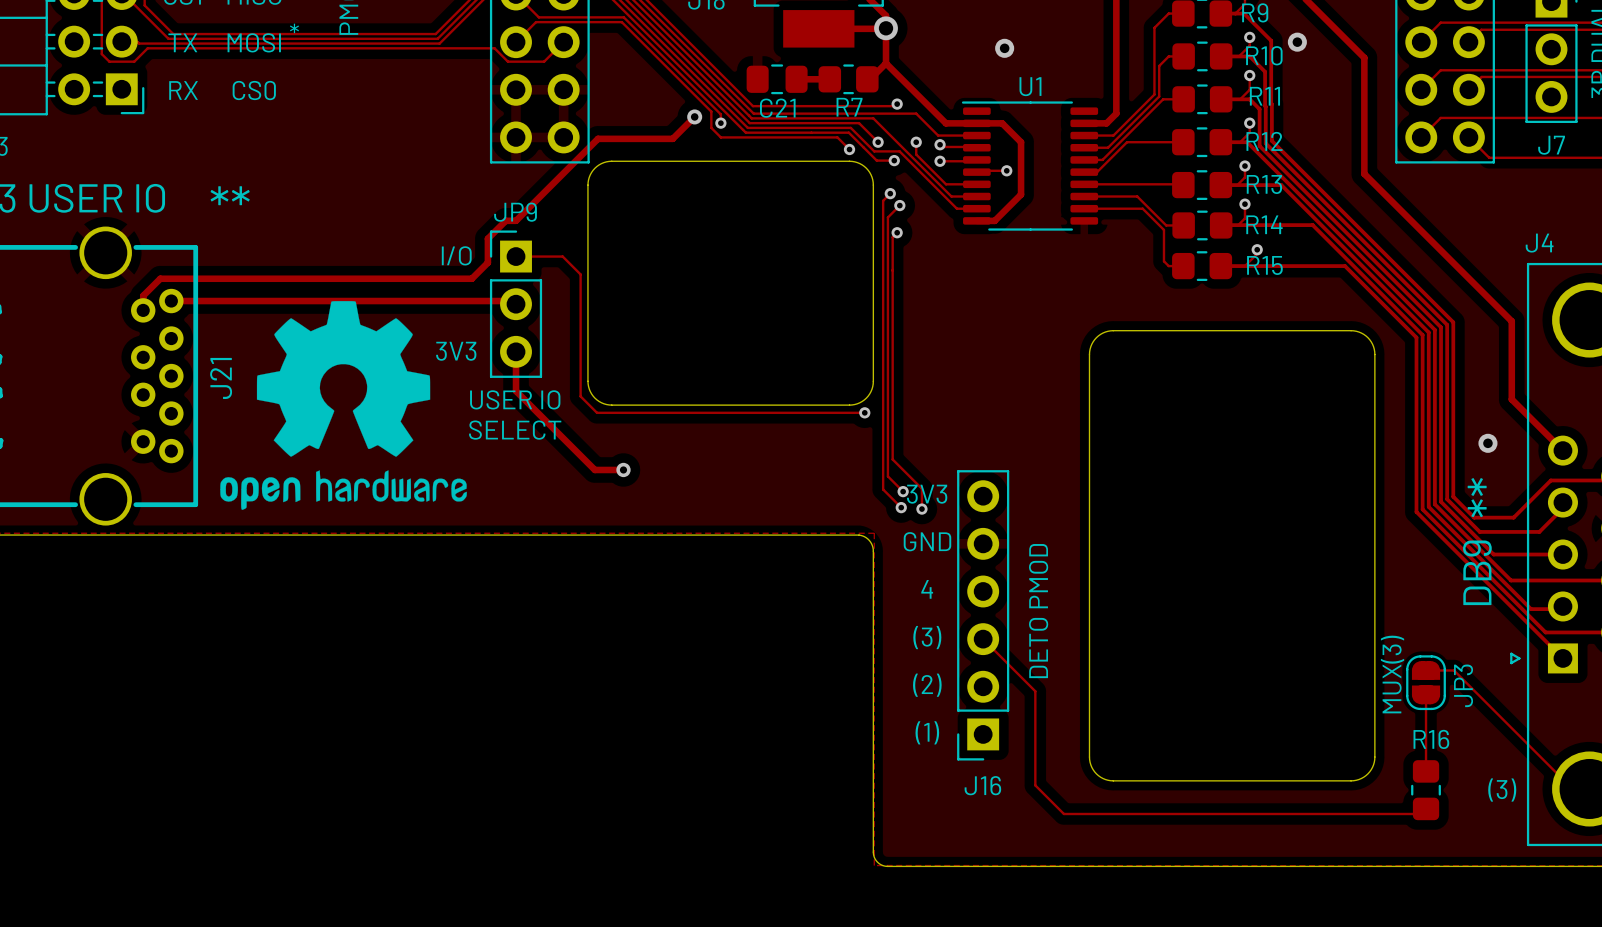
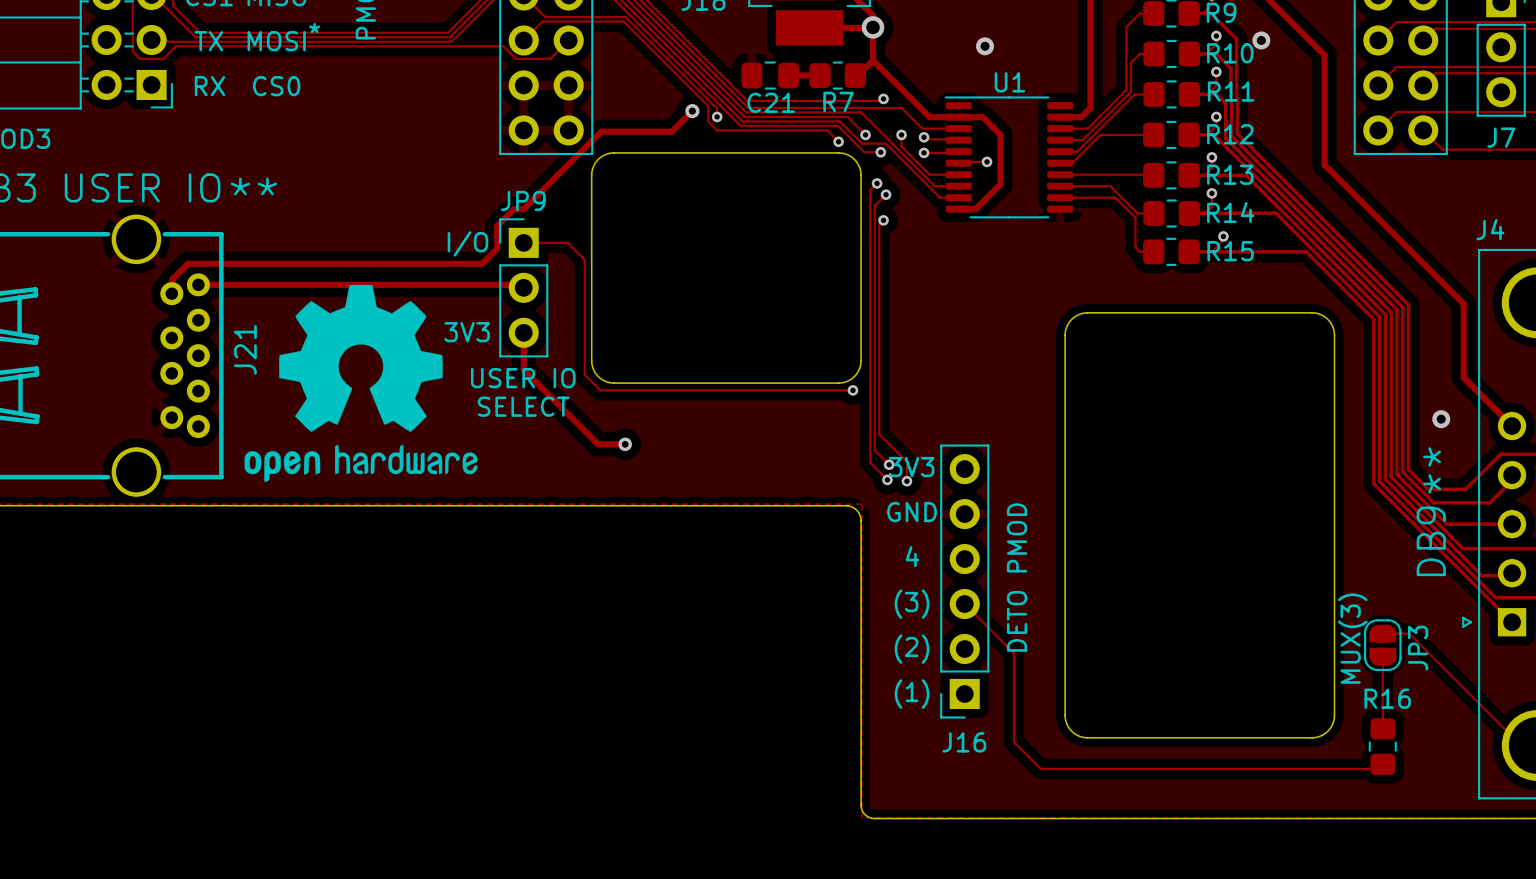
text: (3) (1502, 790) -> none

